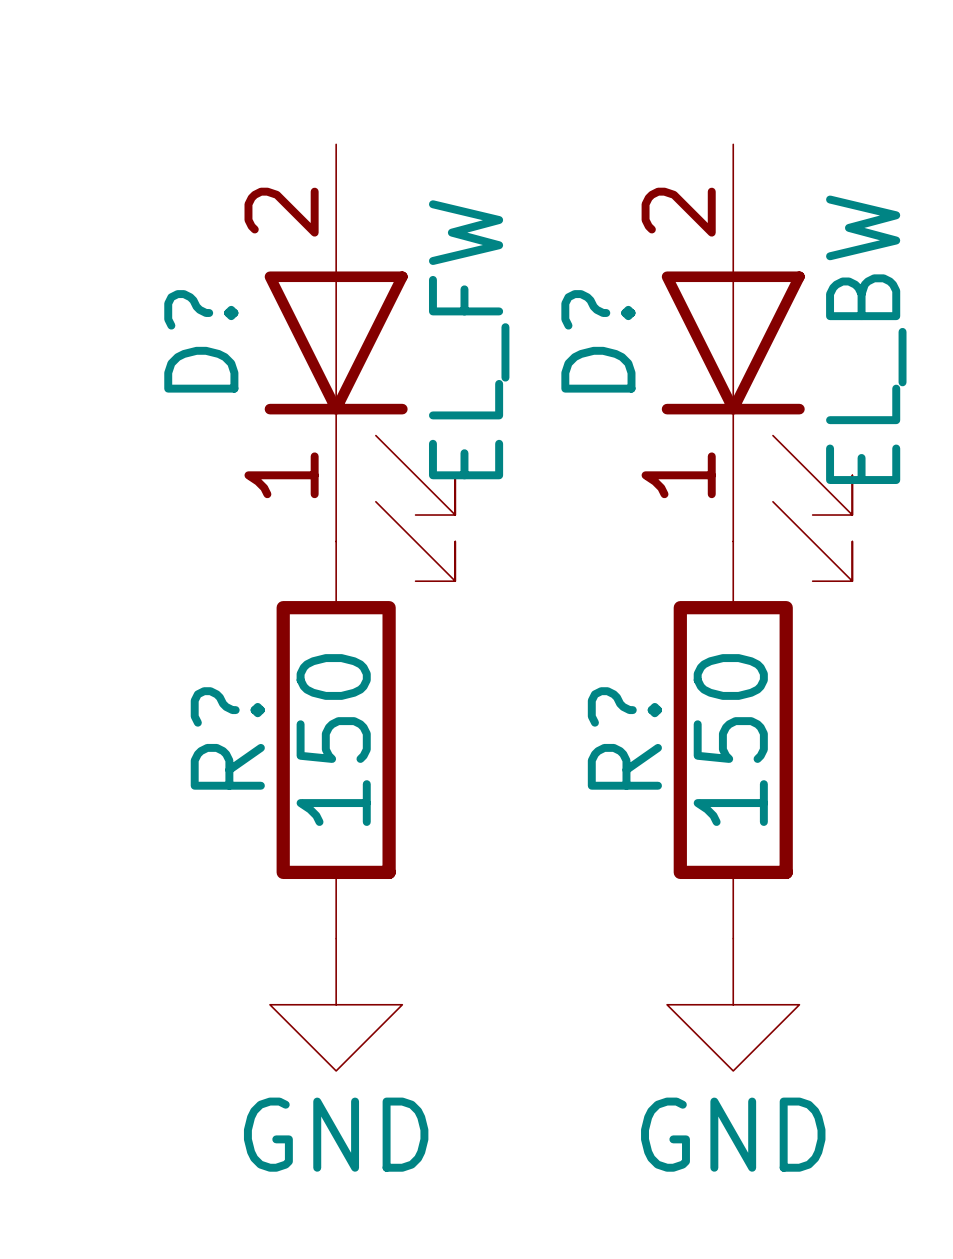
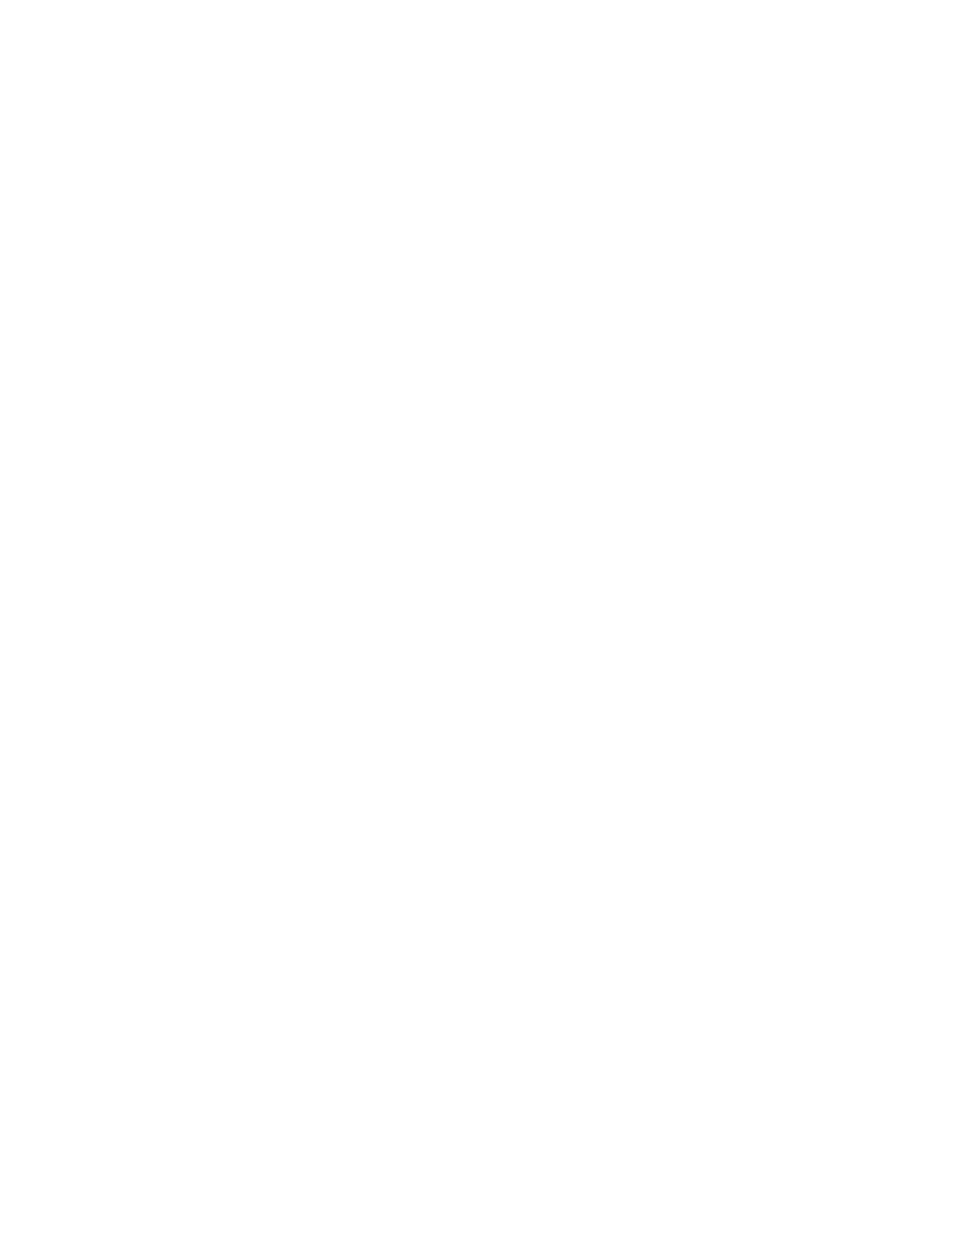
D?: EL_FW (359, 362) -> none
D?: EL_BW (757, 362) -> none
R?: 150 (336, 740) -> none
R?: 150 (733, 740) -> none
power symbol: GND (336, 1004) -> none
power symbol: GND (733, 1004) -> none

